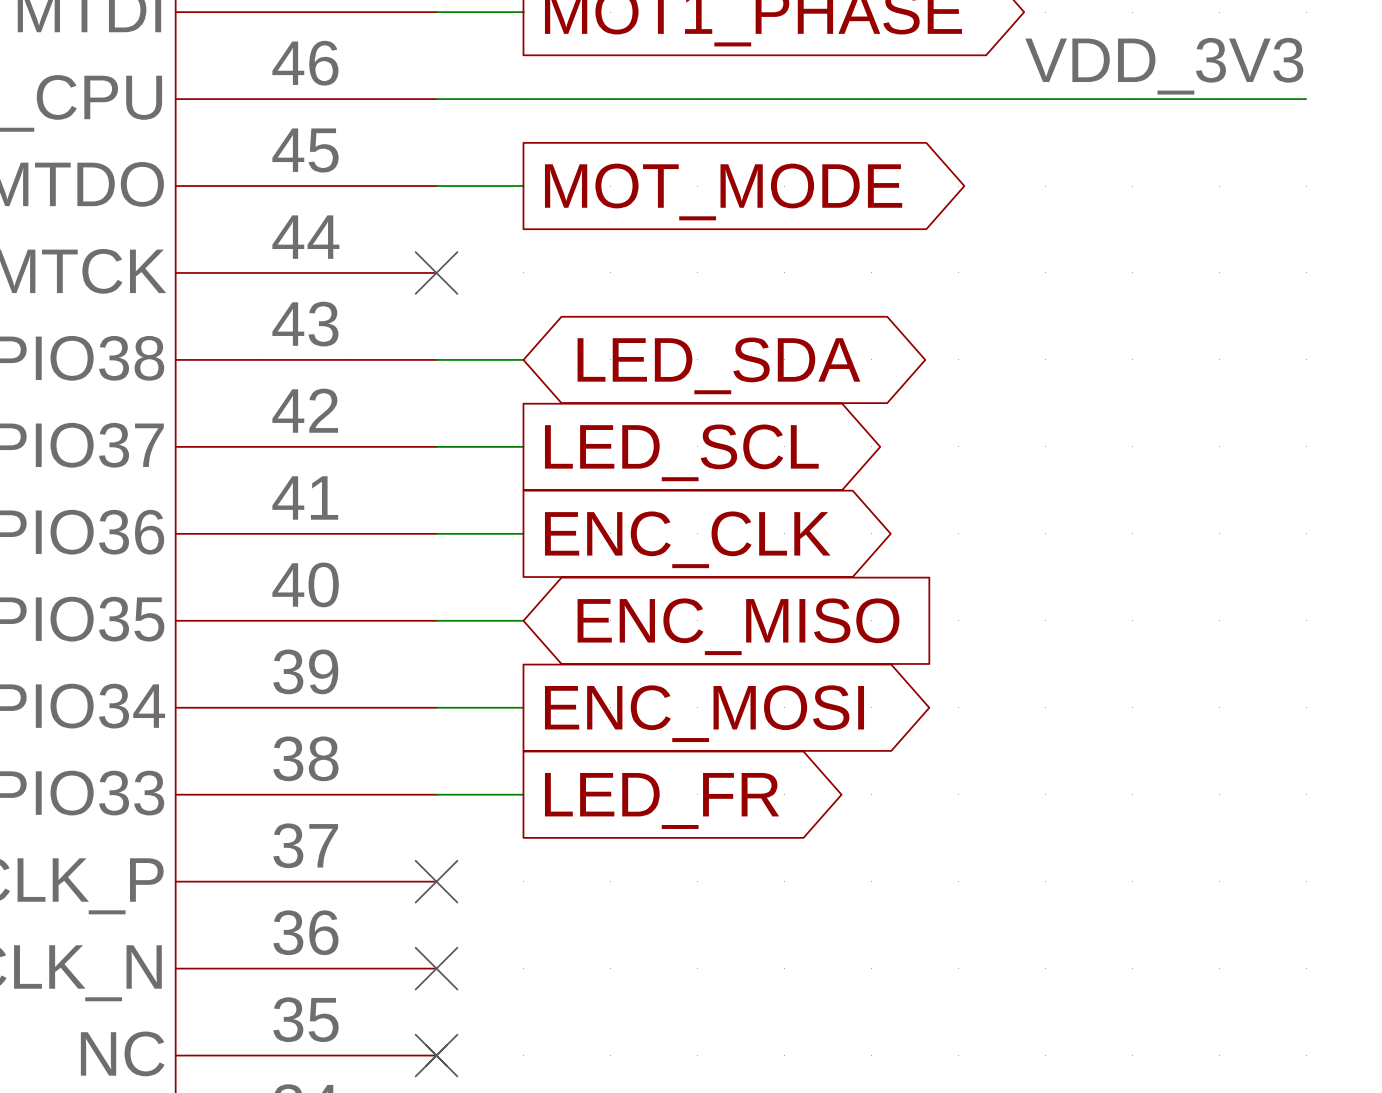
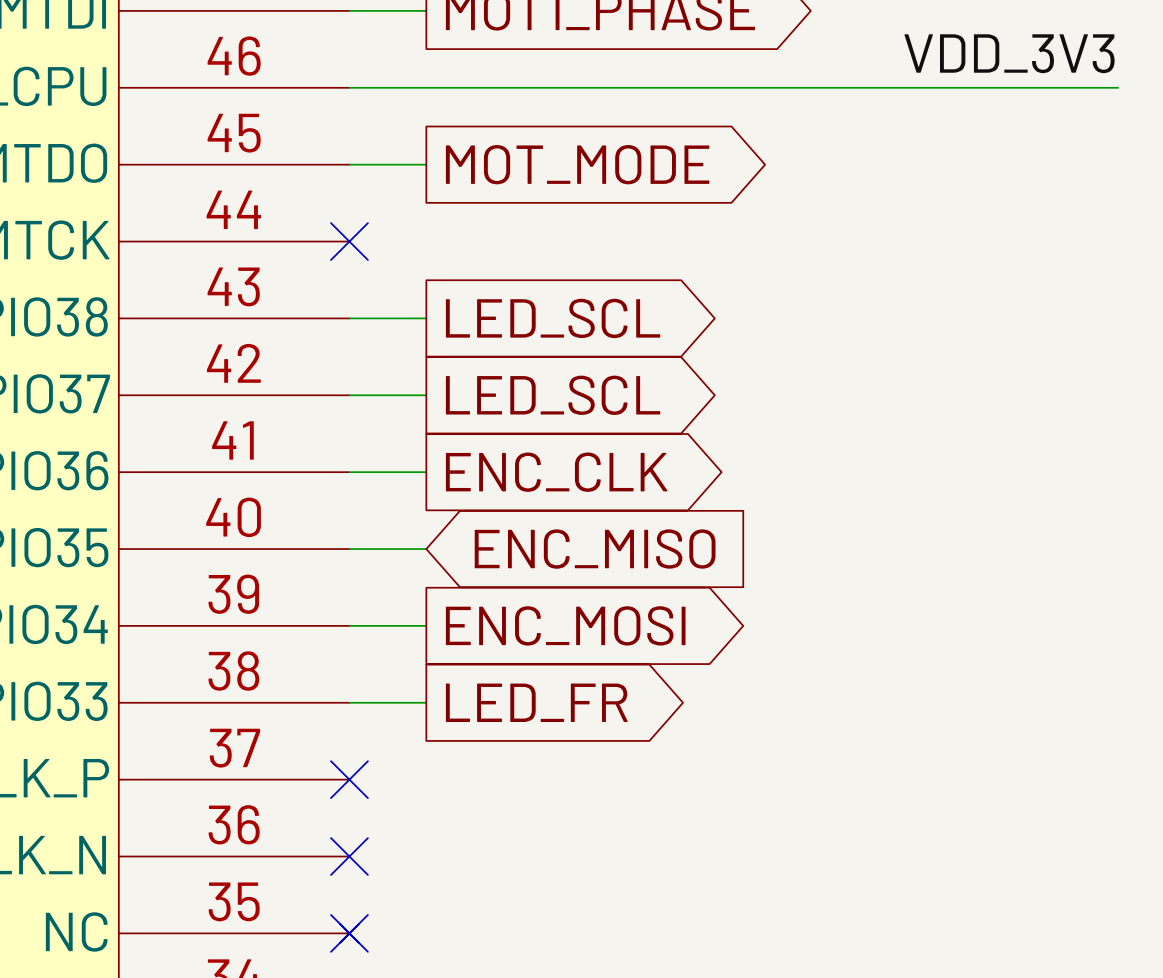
global label shape: bidirectional (718, 365) -> output (553, 318)
global label: LED_SDA (718, 365) -> LED_SCL (553, 318)

